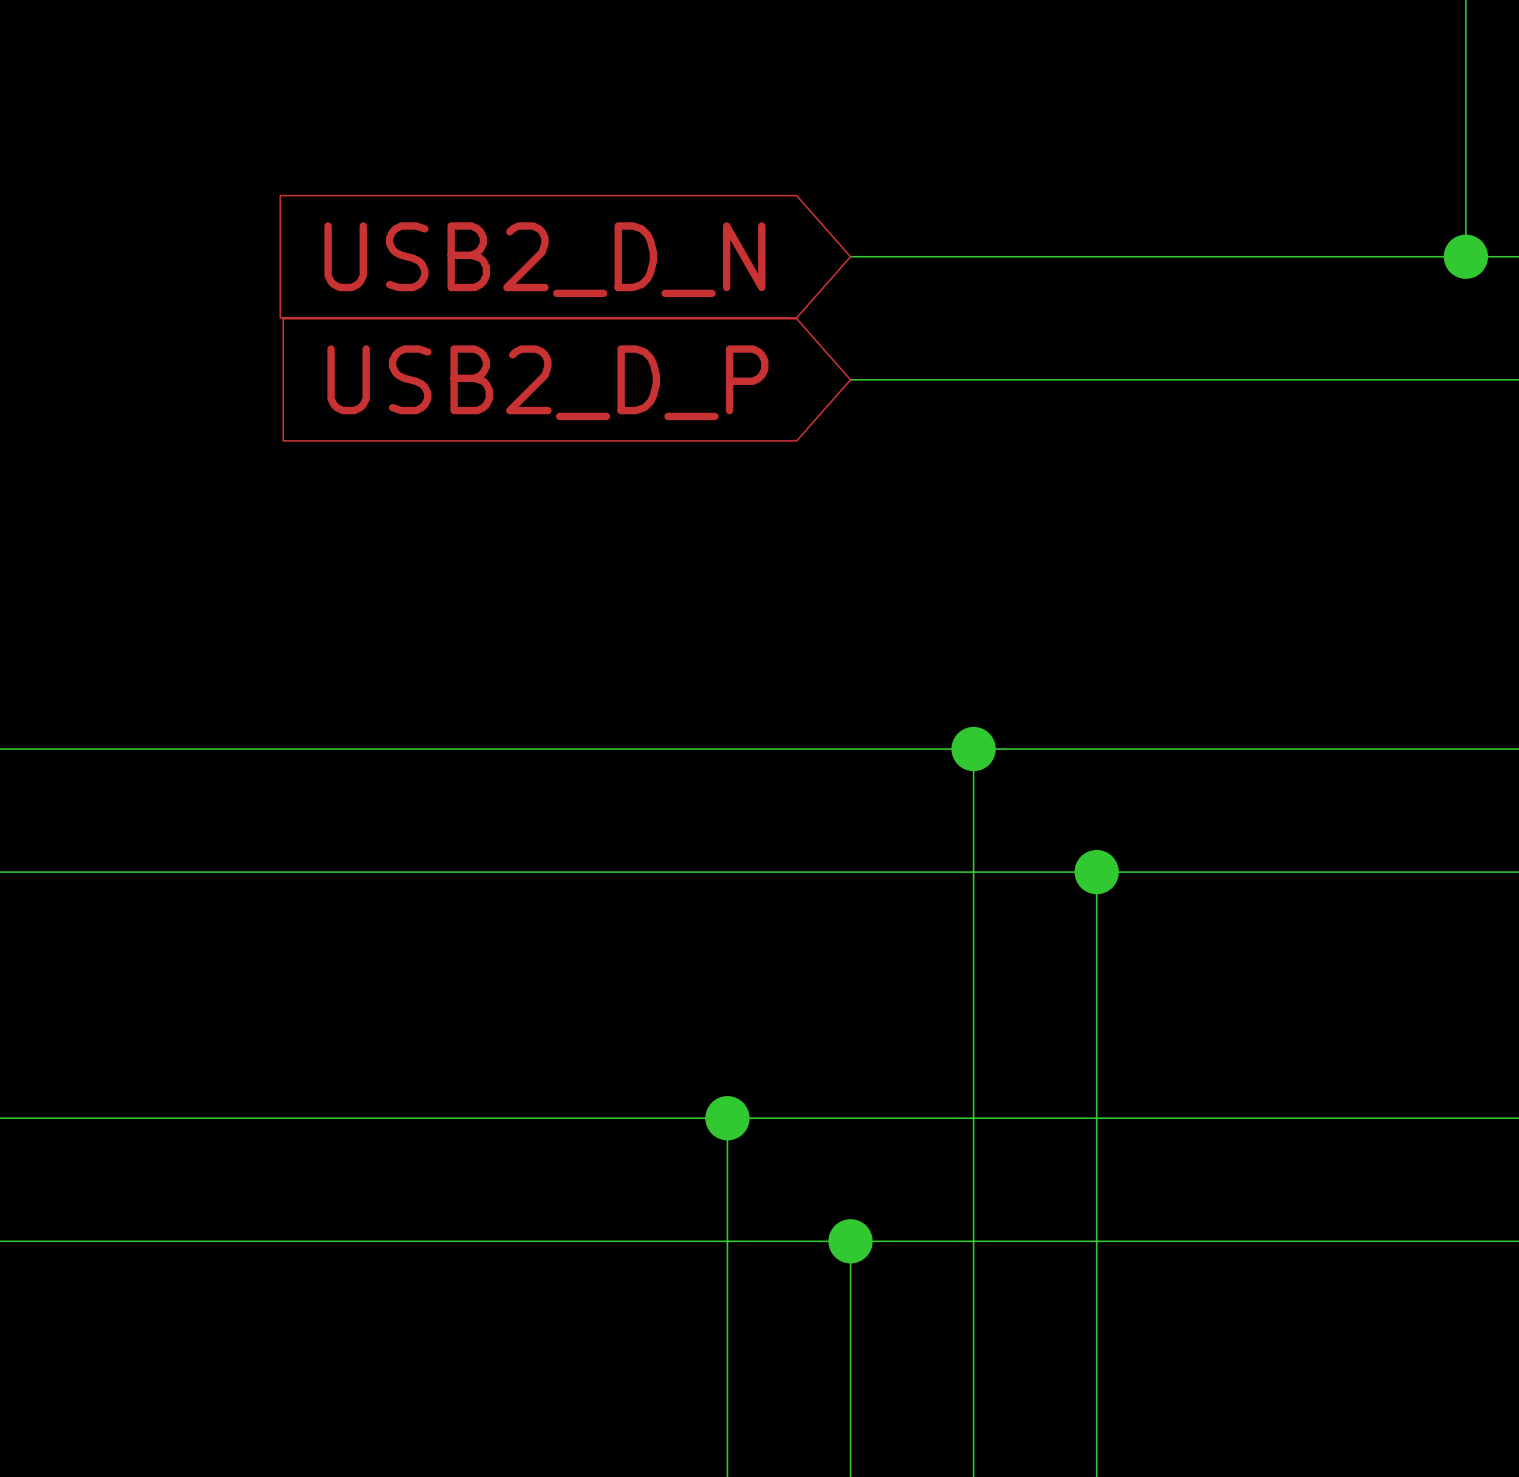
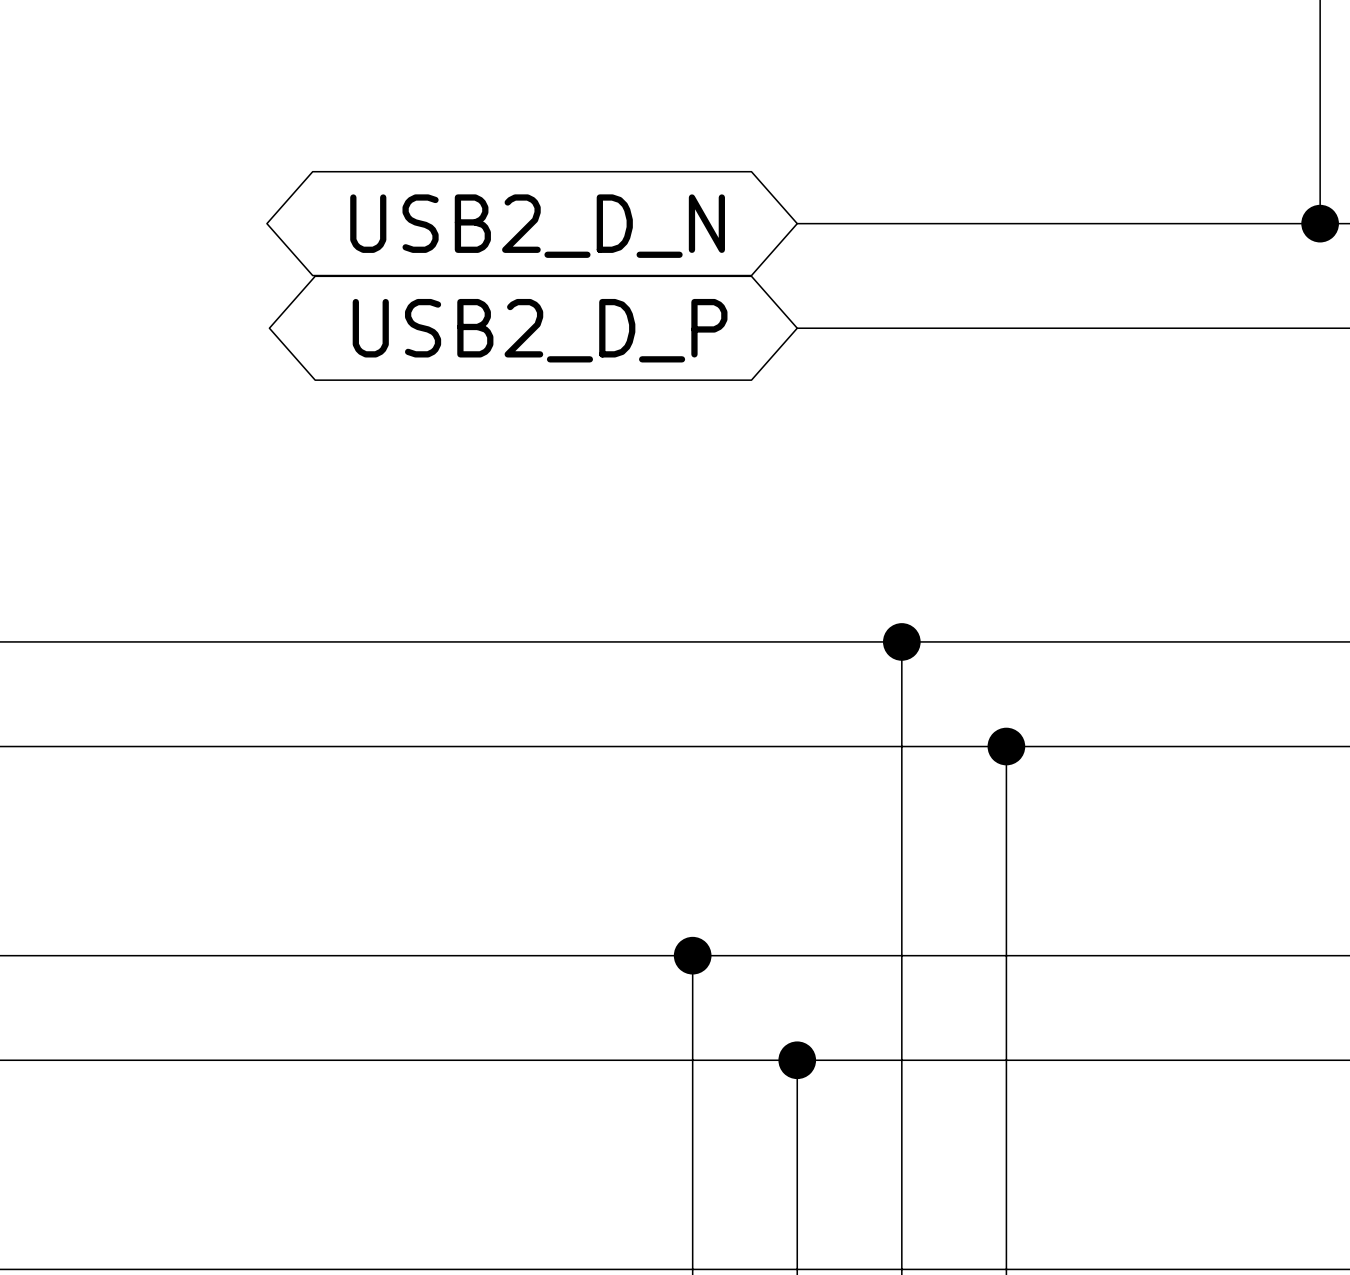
global label shape: input (544, 259) -> bidirectional (537, 226)
global label shape: input (547, 382) -> bidirectional (540, 330)

